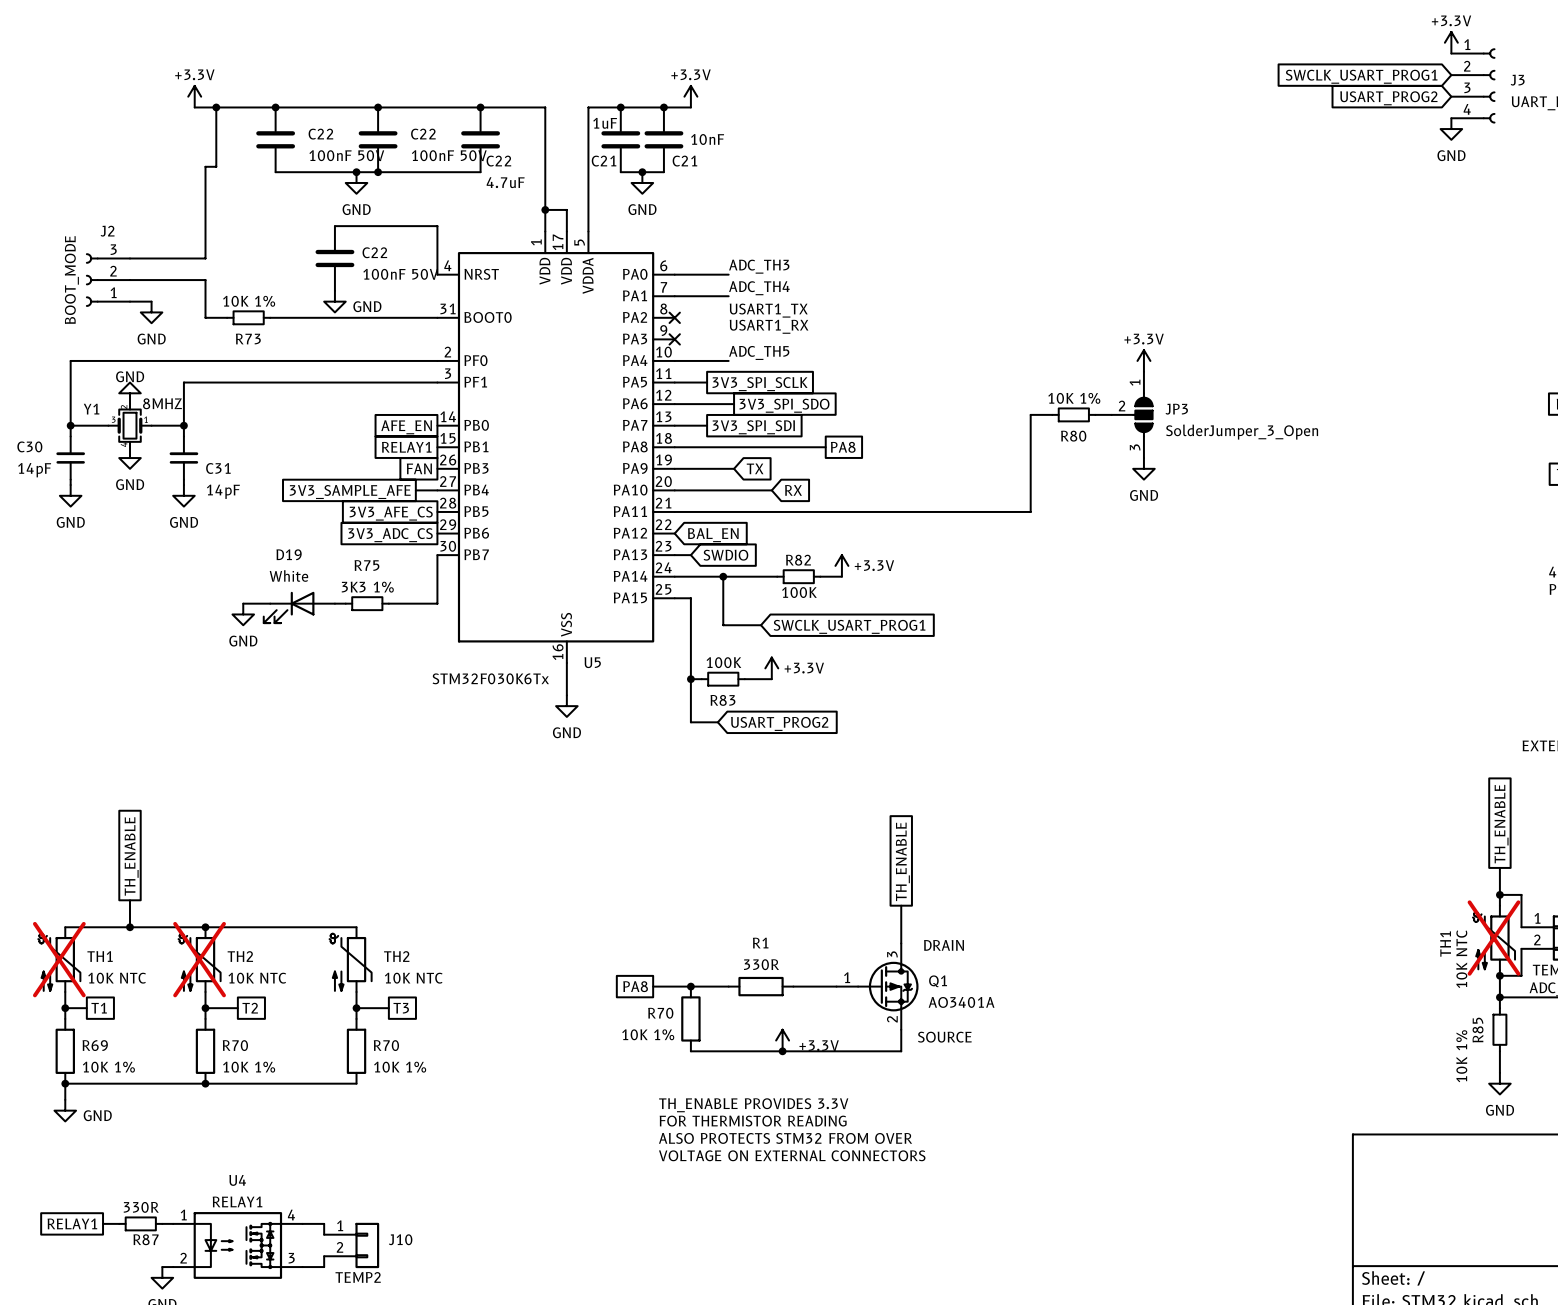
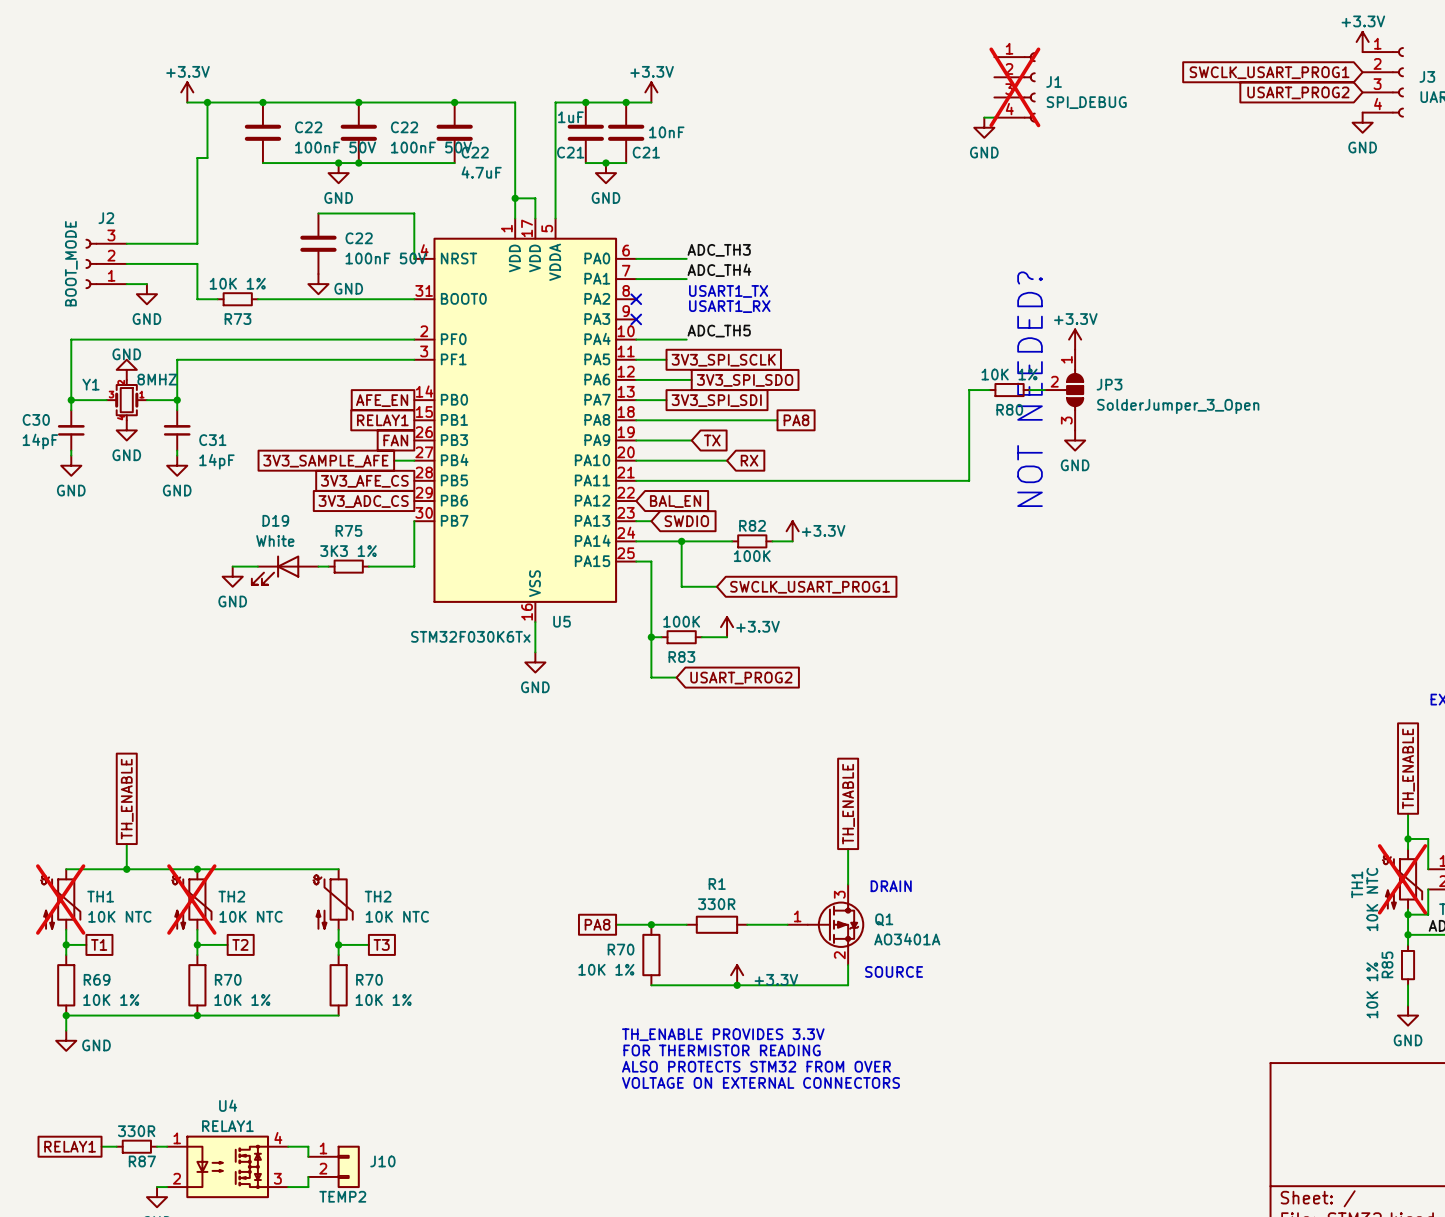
J1: none -> SPI_DEBUG (1014, 87)
wire: none -> (984, 117) (994, 117)
power symbol: none -> GND (984, 127)
text: none -> NOT NEEDED? (1030, 389)

